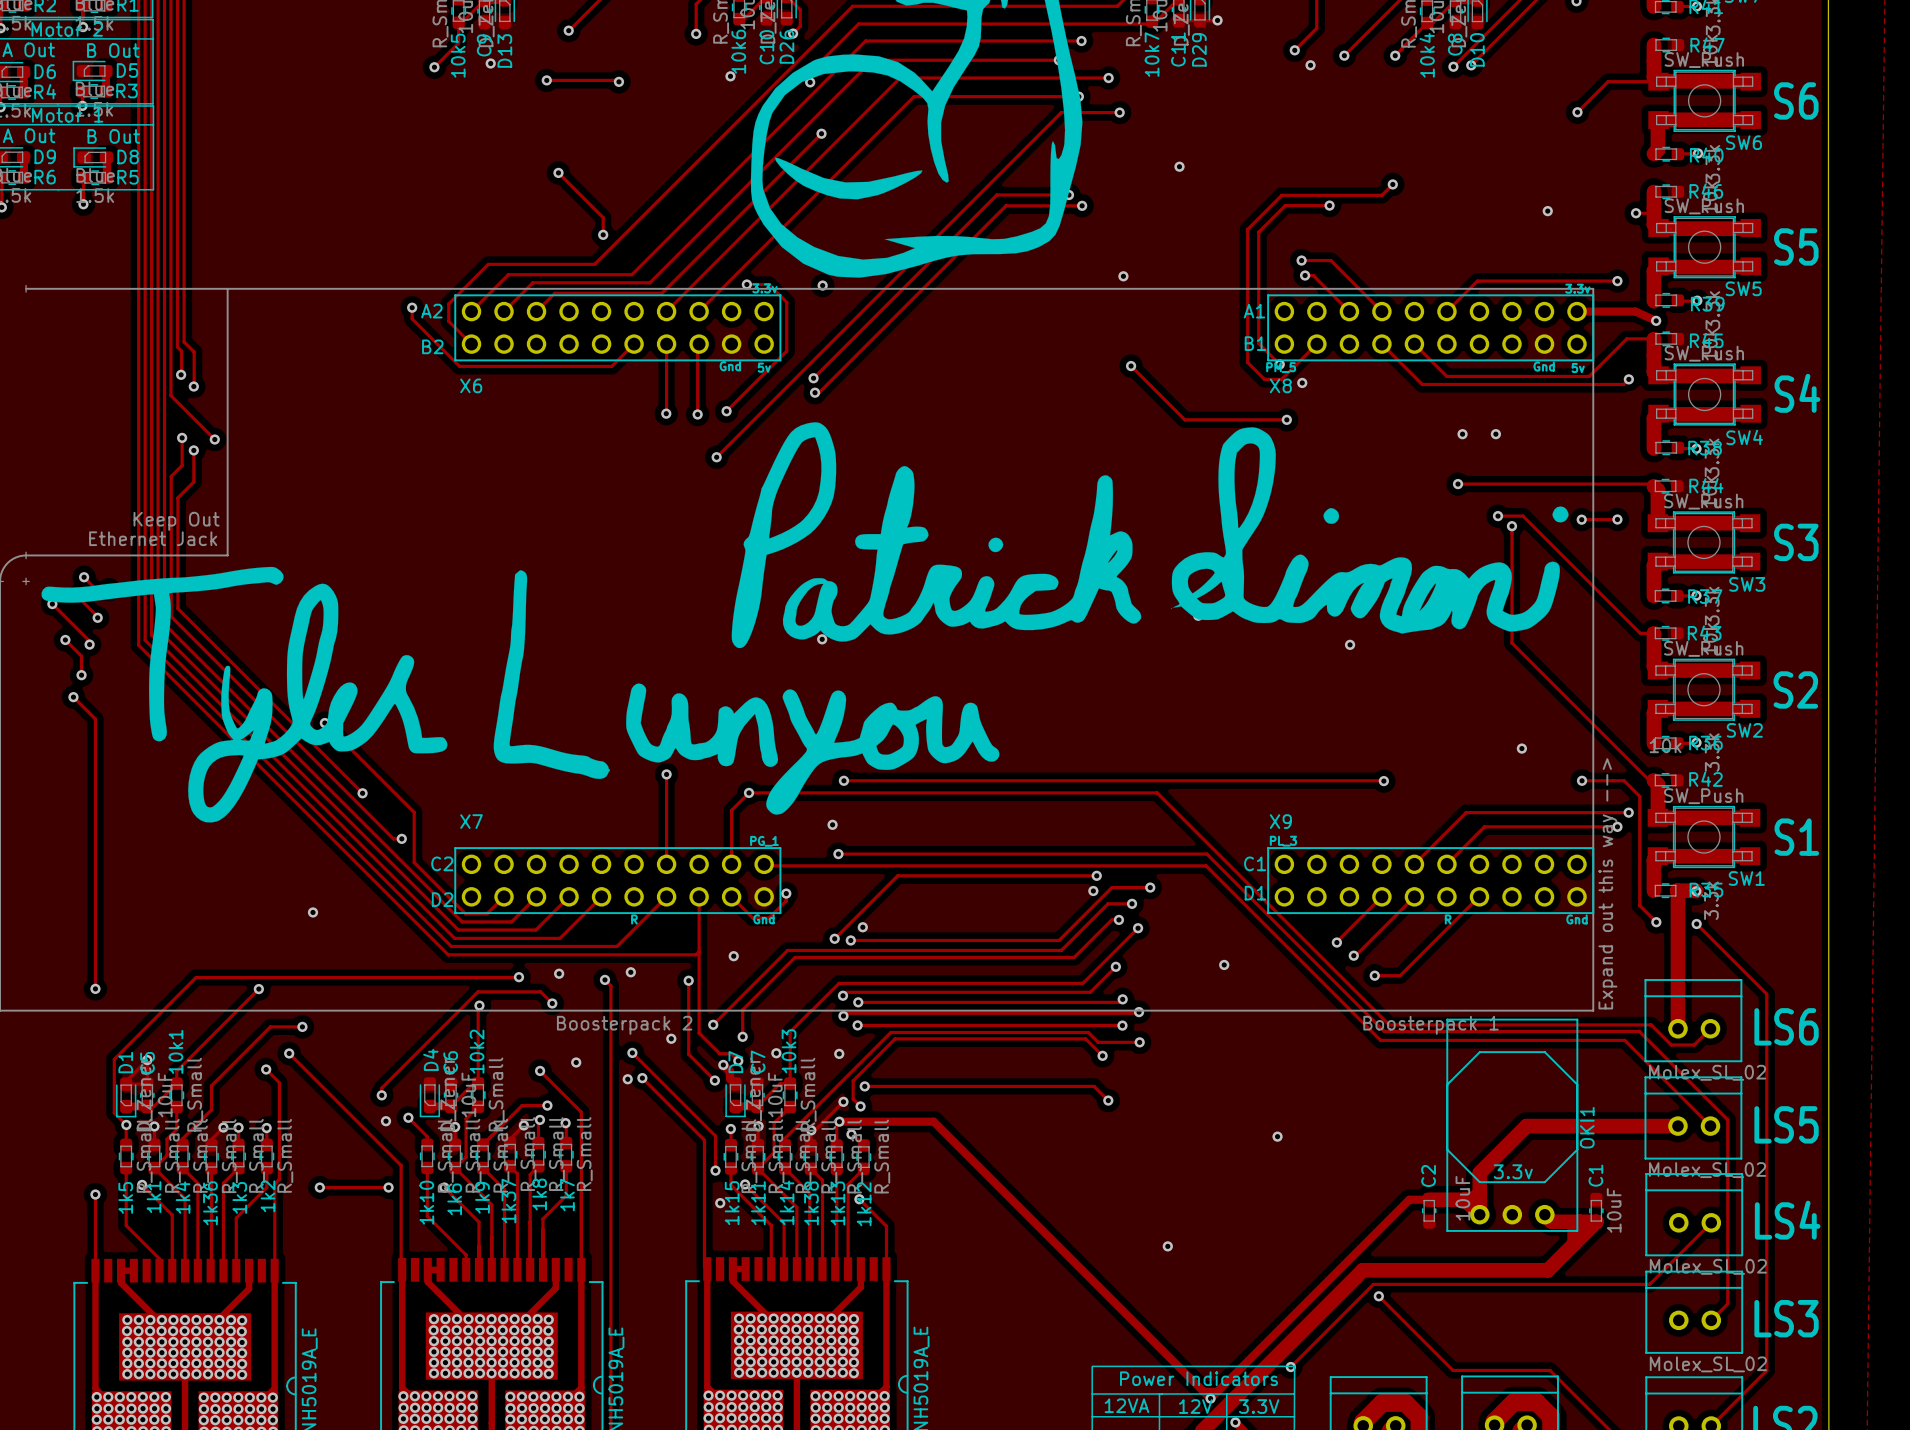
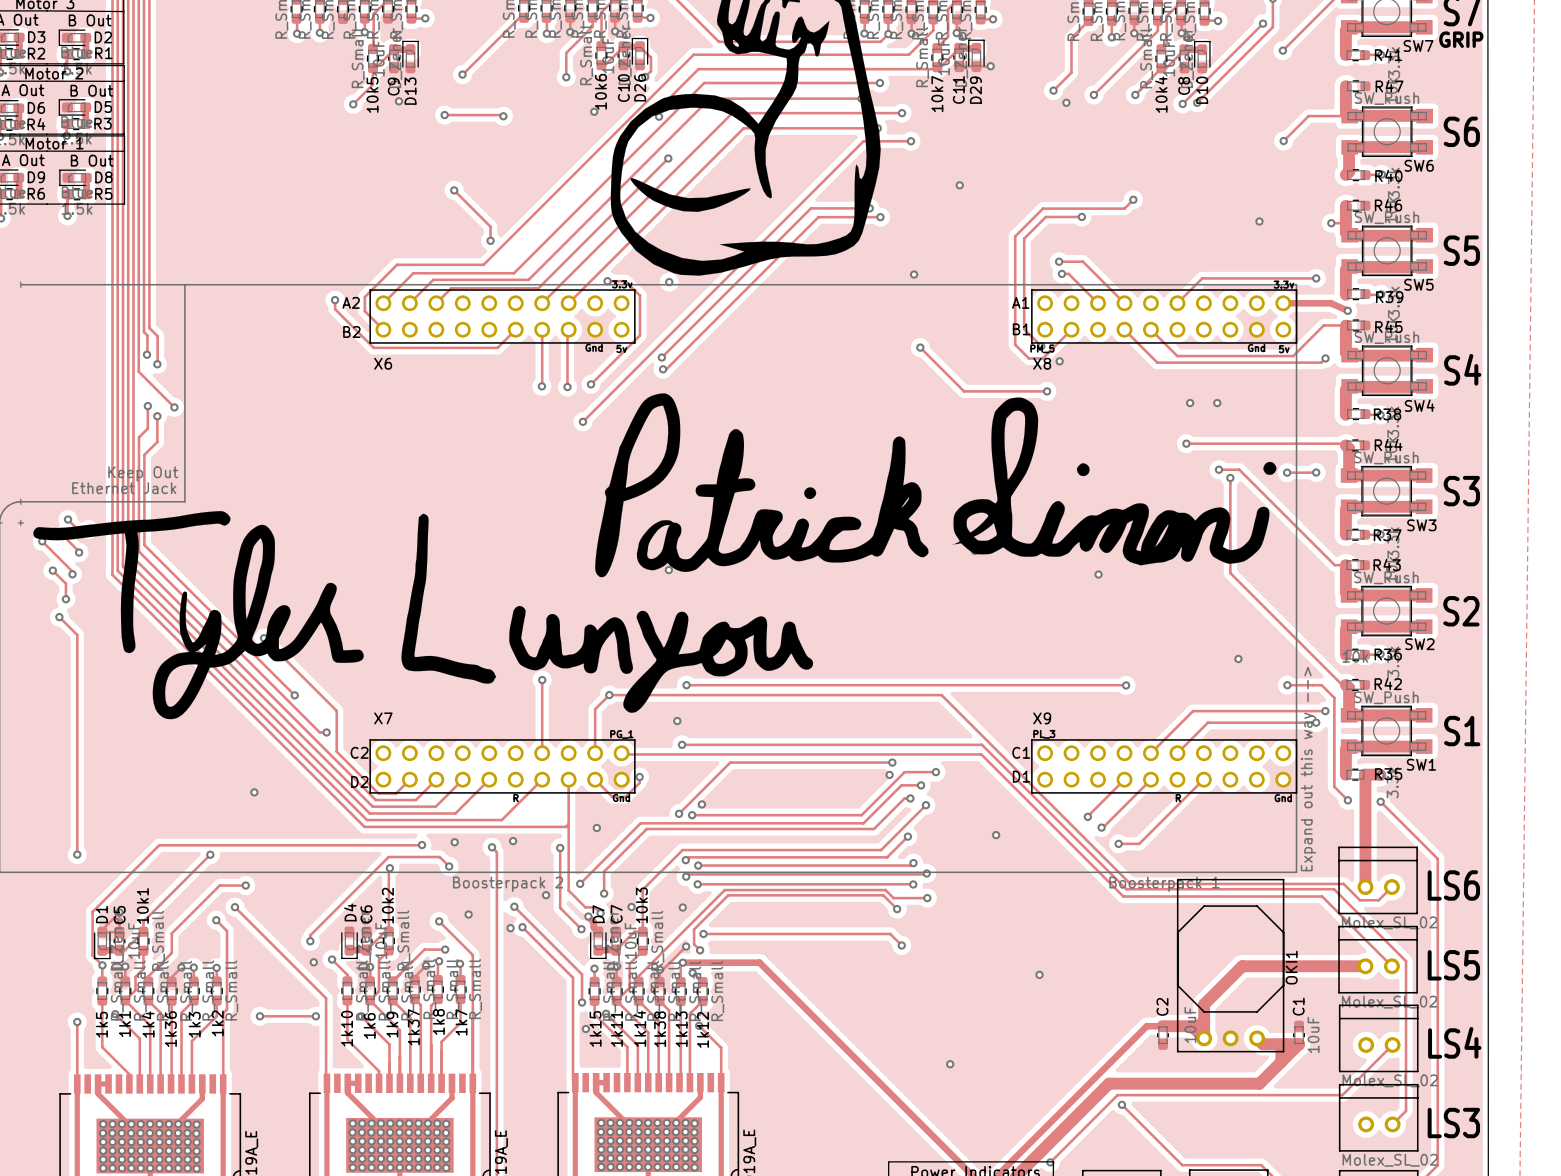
text: 3.3v (1513, 1171) -> none

